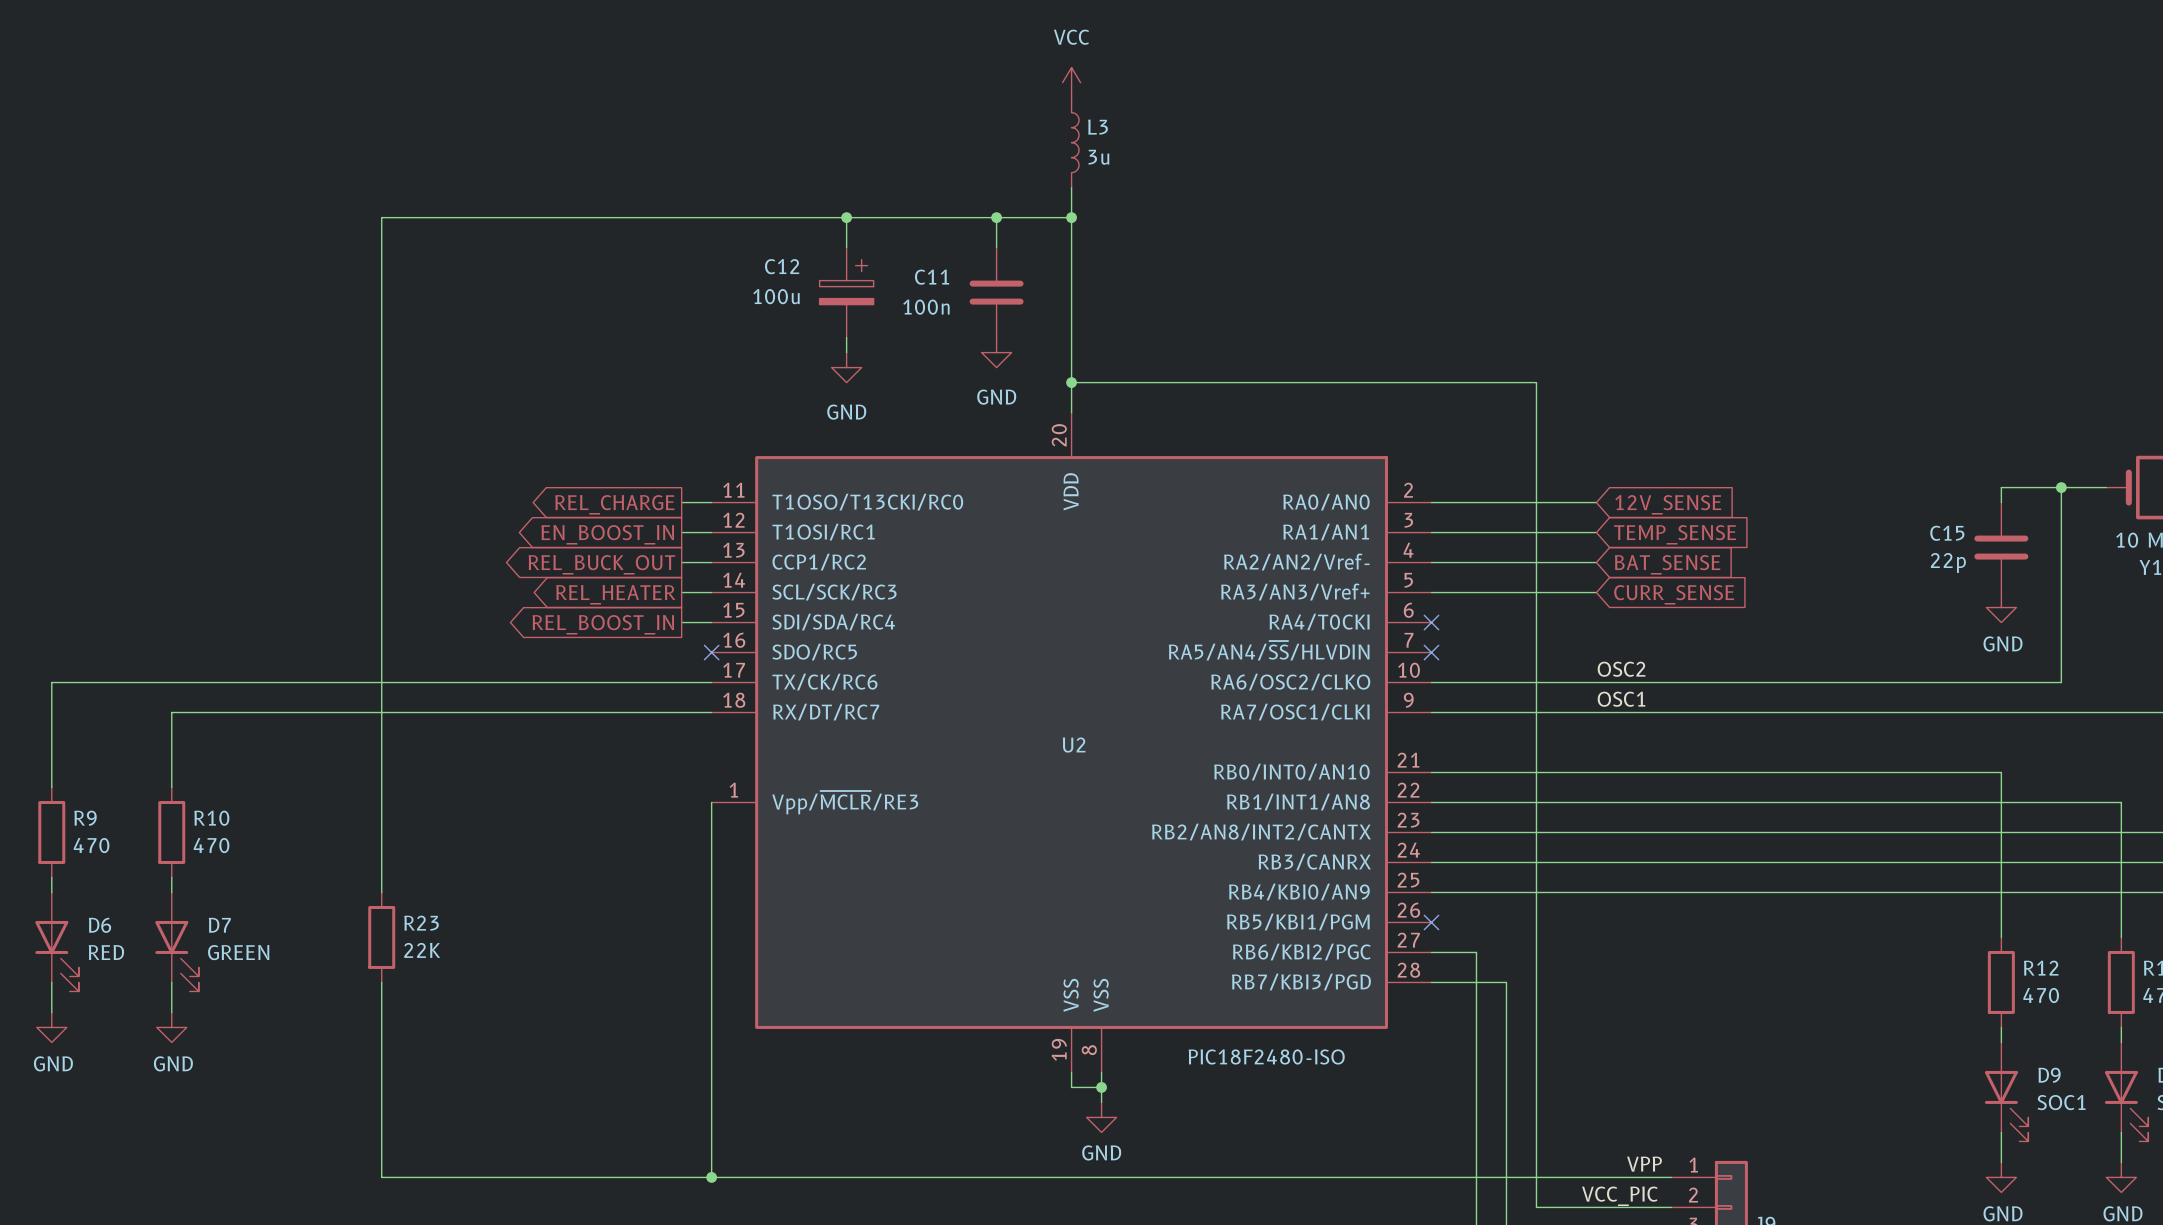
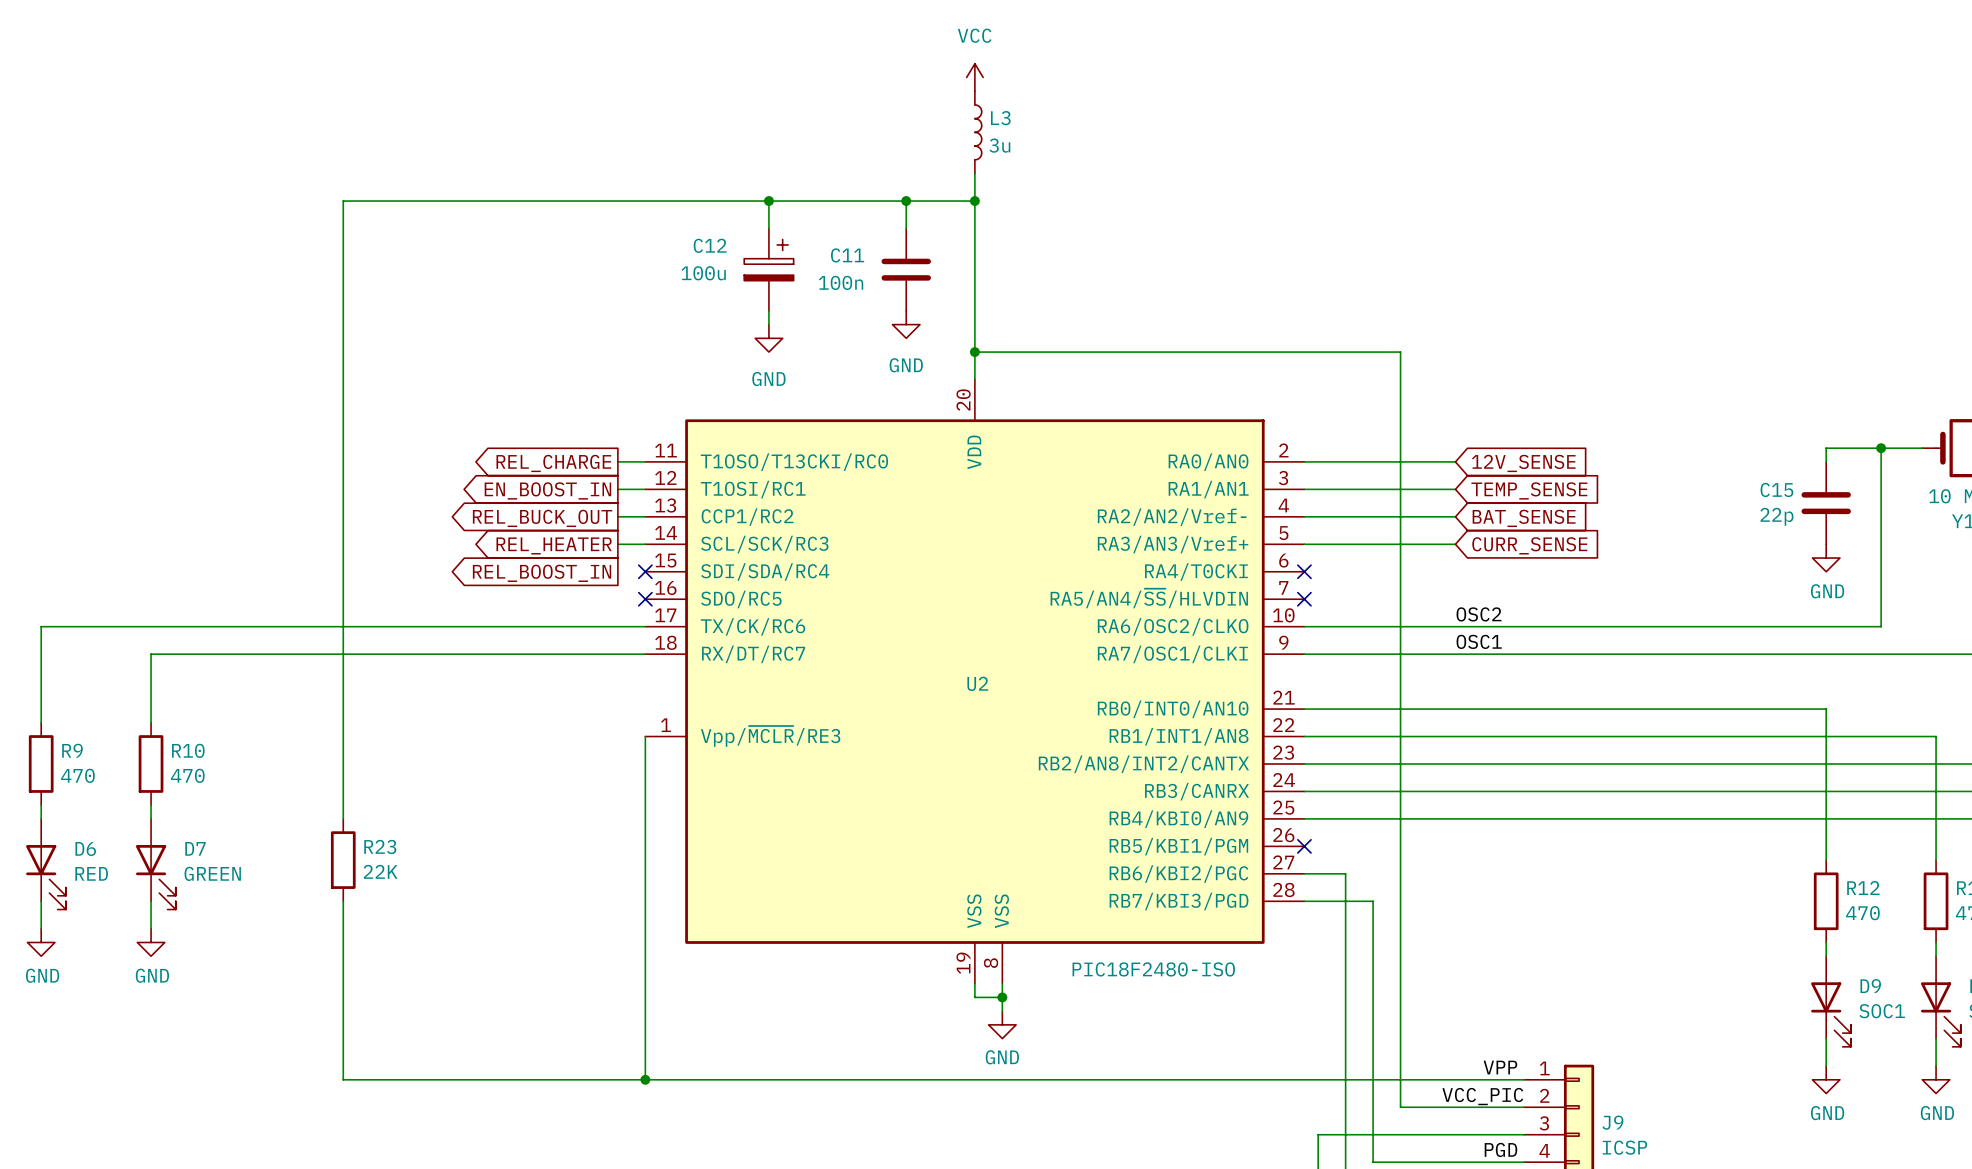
wire: (681, 622) (711, 622) -> none
no-connect mark: none -> (645, 571)

